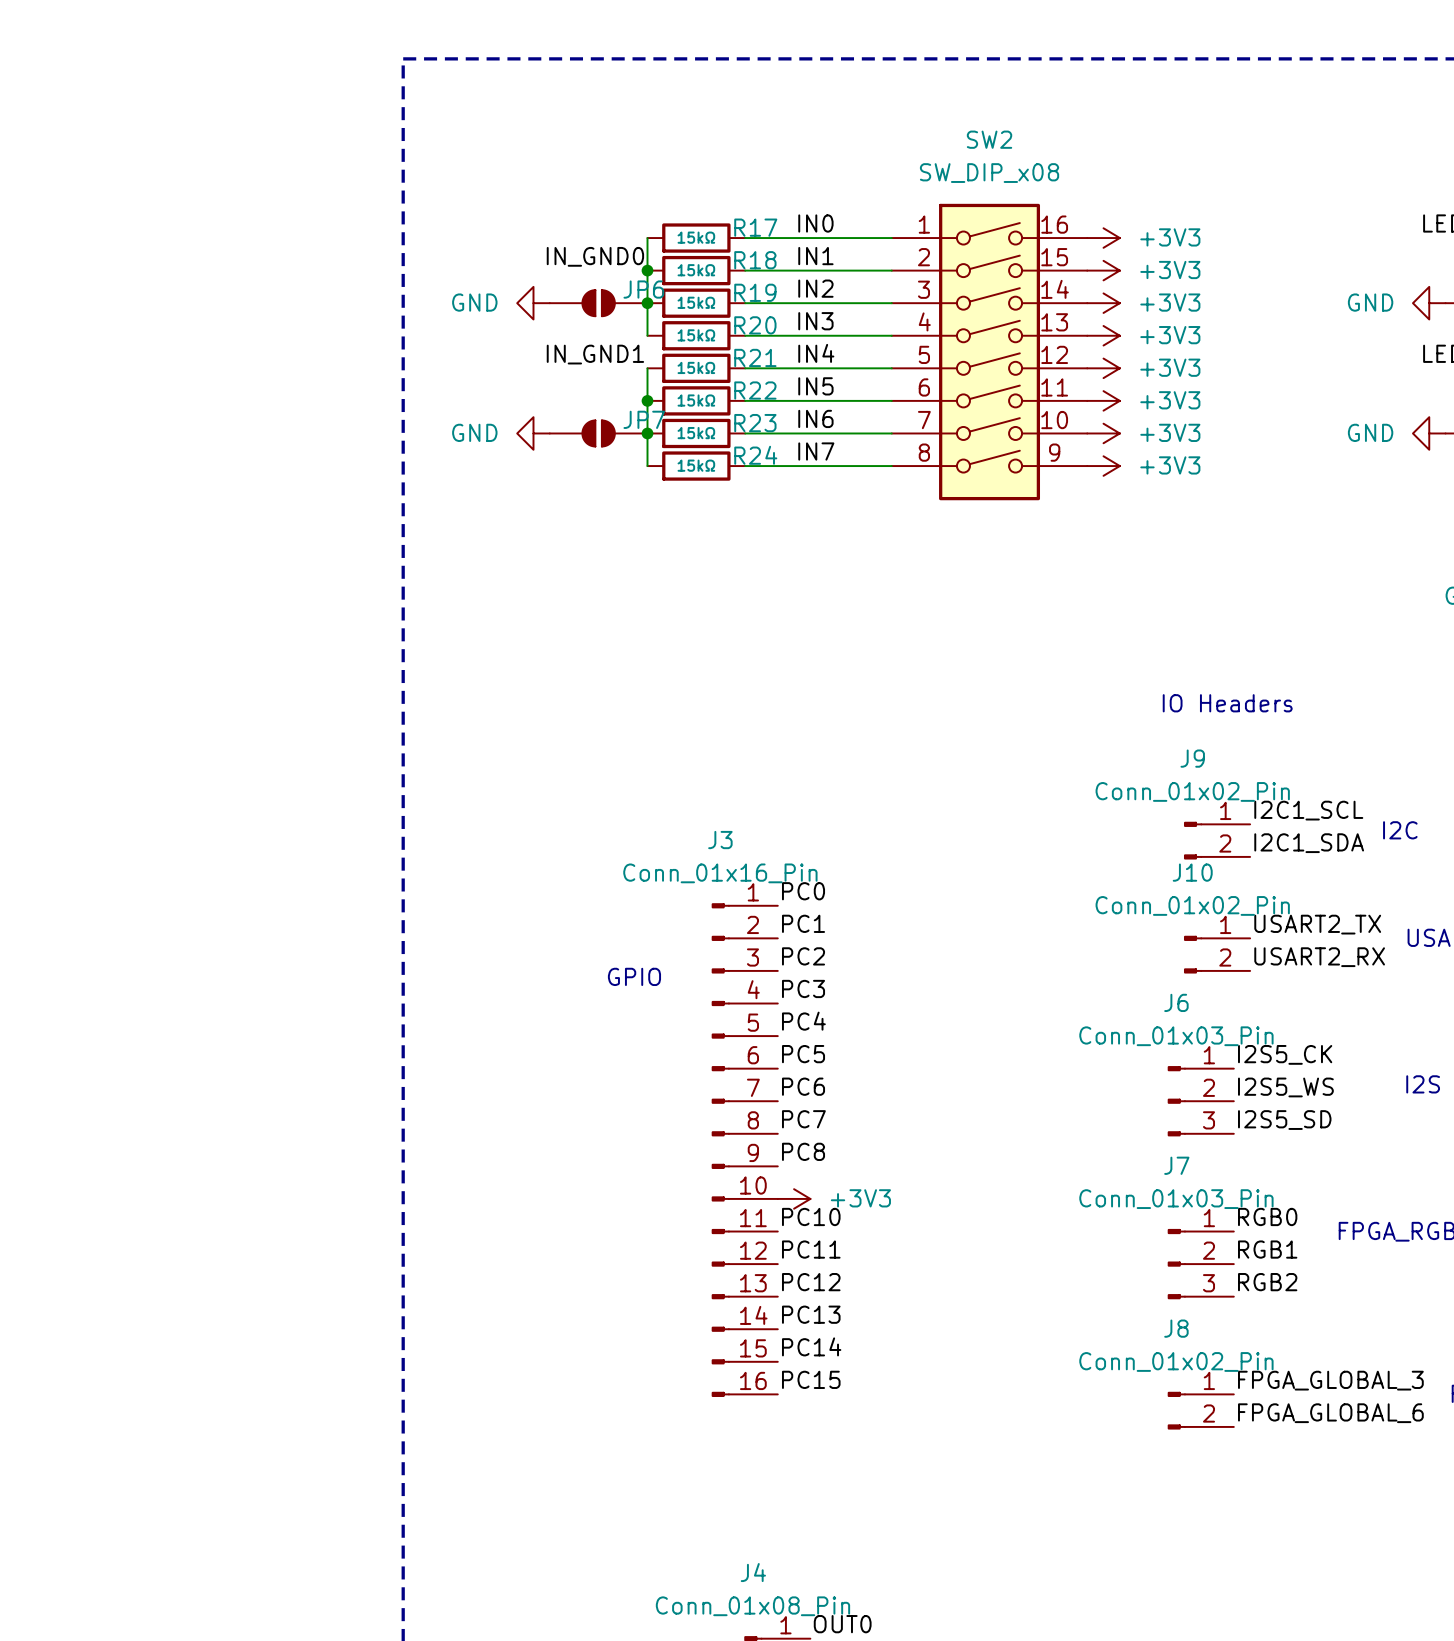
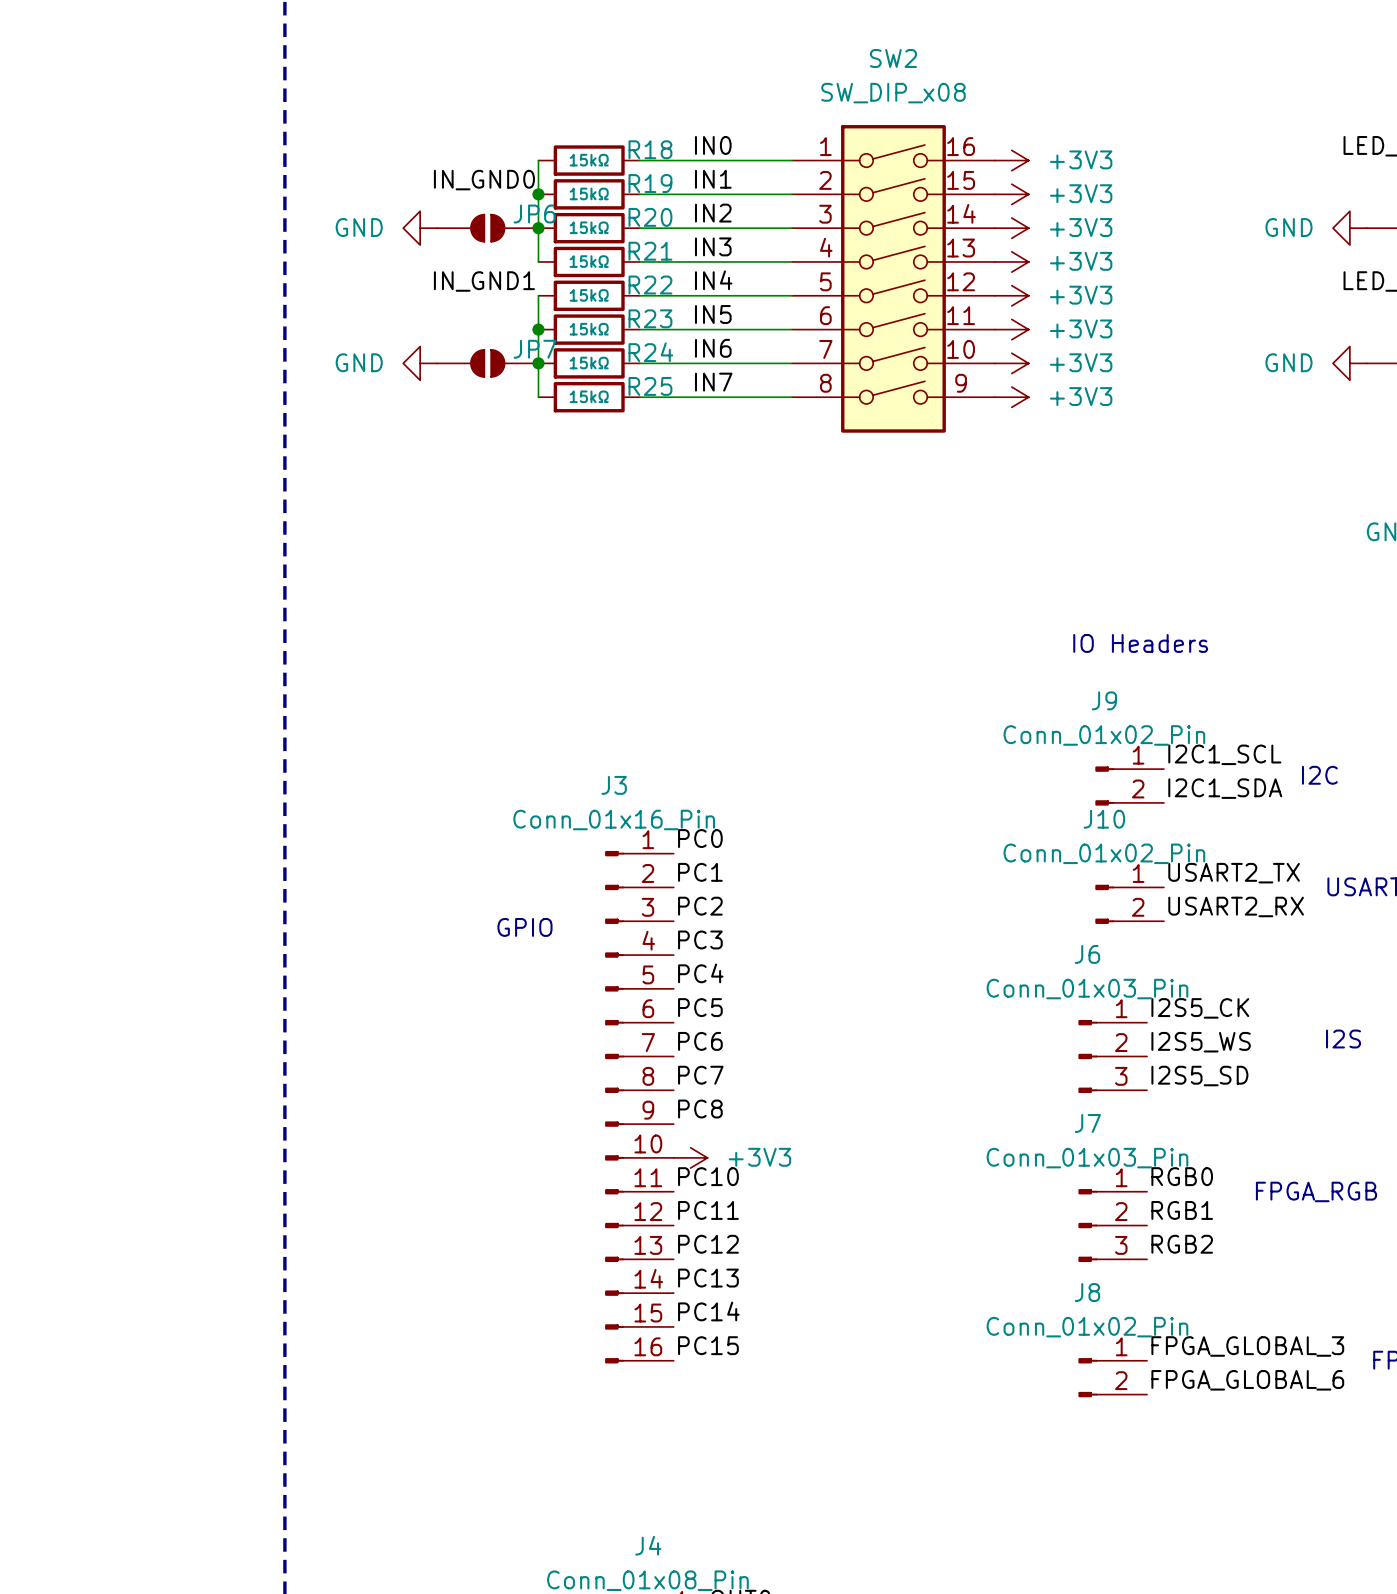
R17 name: R17 (755, 227) -> R18 (650, 149)
R18 name: R18 (755, 260) -> R19 (650, 183)
R19 name: R19 (755, 292) -> R20 (650, 217)
R20 name: R20 (755, 325) -> R21 (650, 251)
R21 name: R21 (755, 357) -> R22 (650, 285)
R22 name: R22 (755, 390) -> R23 (650, 318)
R23 name: R23 (755, 423) -> R24 (650, 352)
R24 name: R24 (755, 455) -> R25 (650, 386)

